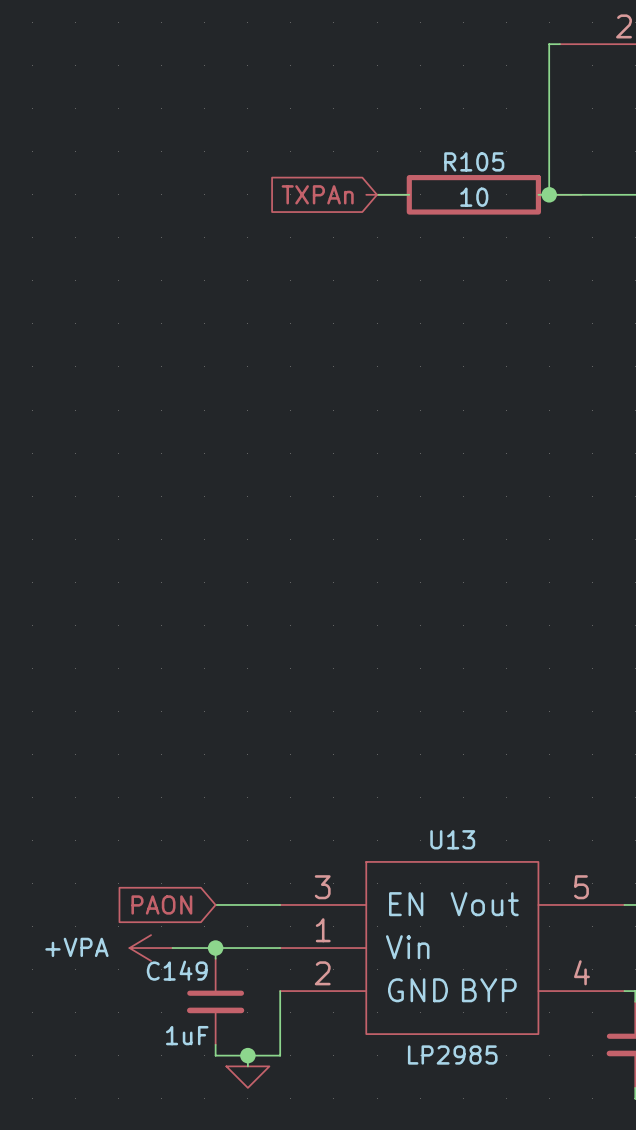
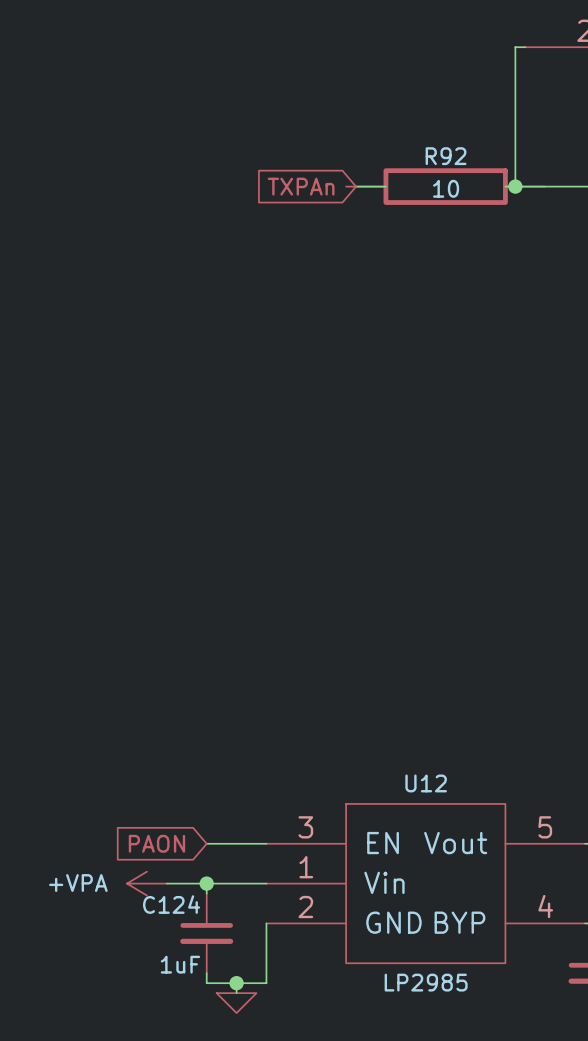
R105 name: R105 (474, 161) -> R92 (446, 156)
U13 name: U13 (452, 839) -> U12 (426, 783)
C149 name: C149 (177, 970) -> C124 (171, 904)

